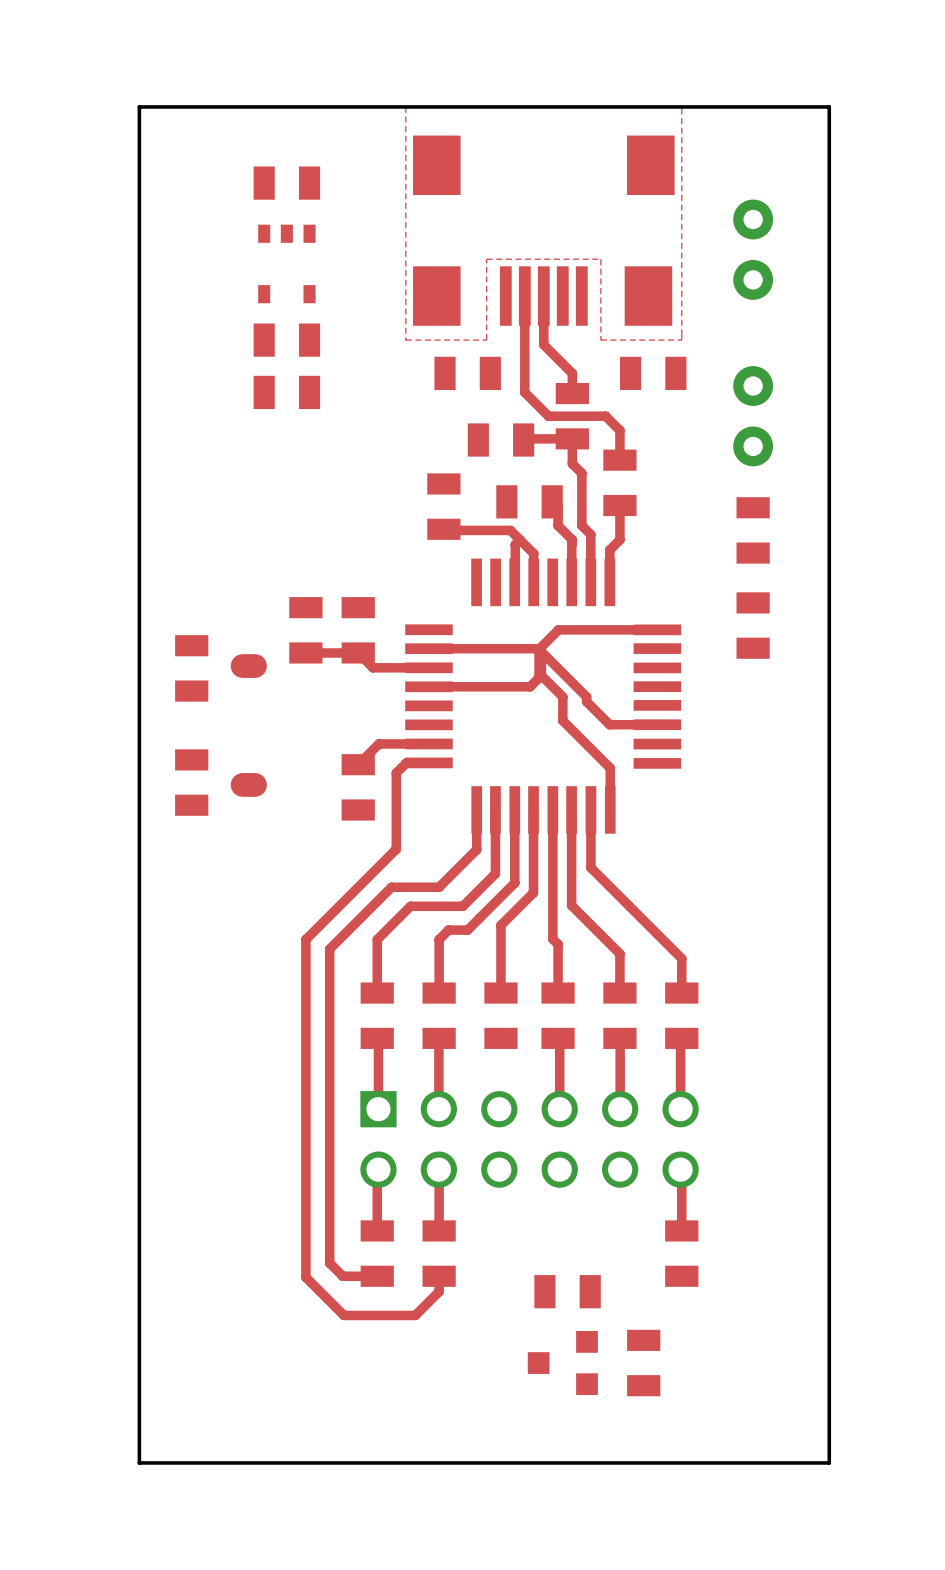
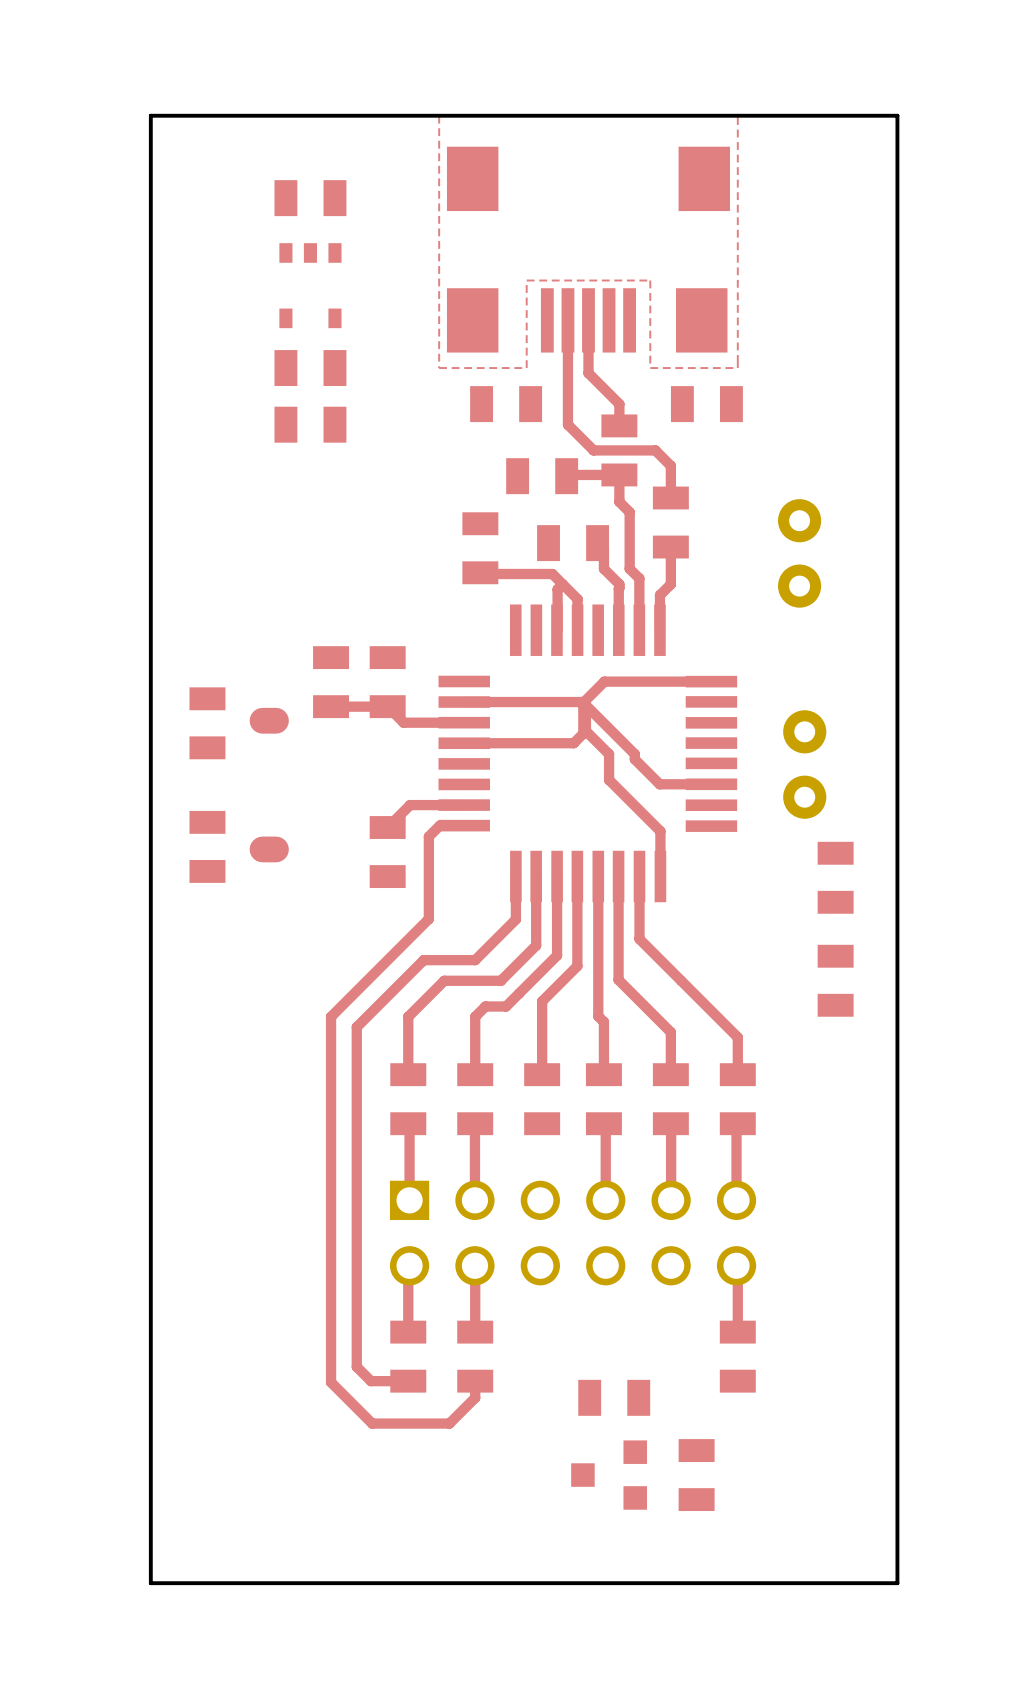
part: (753, 249) -> none
part position: (753, 416) -> (799, 553)
part: (753, 530) -> none
part: (753, 625) -> none
part: none -> (804, 764)
part: none -> (835, 877)
part: none -> (835, 980)

